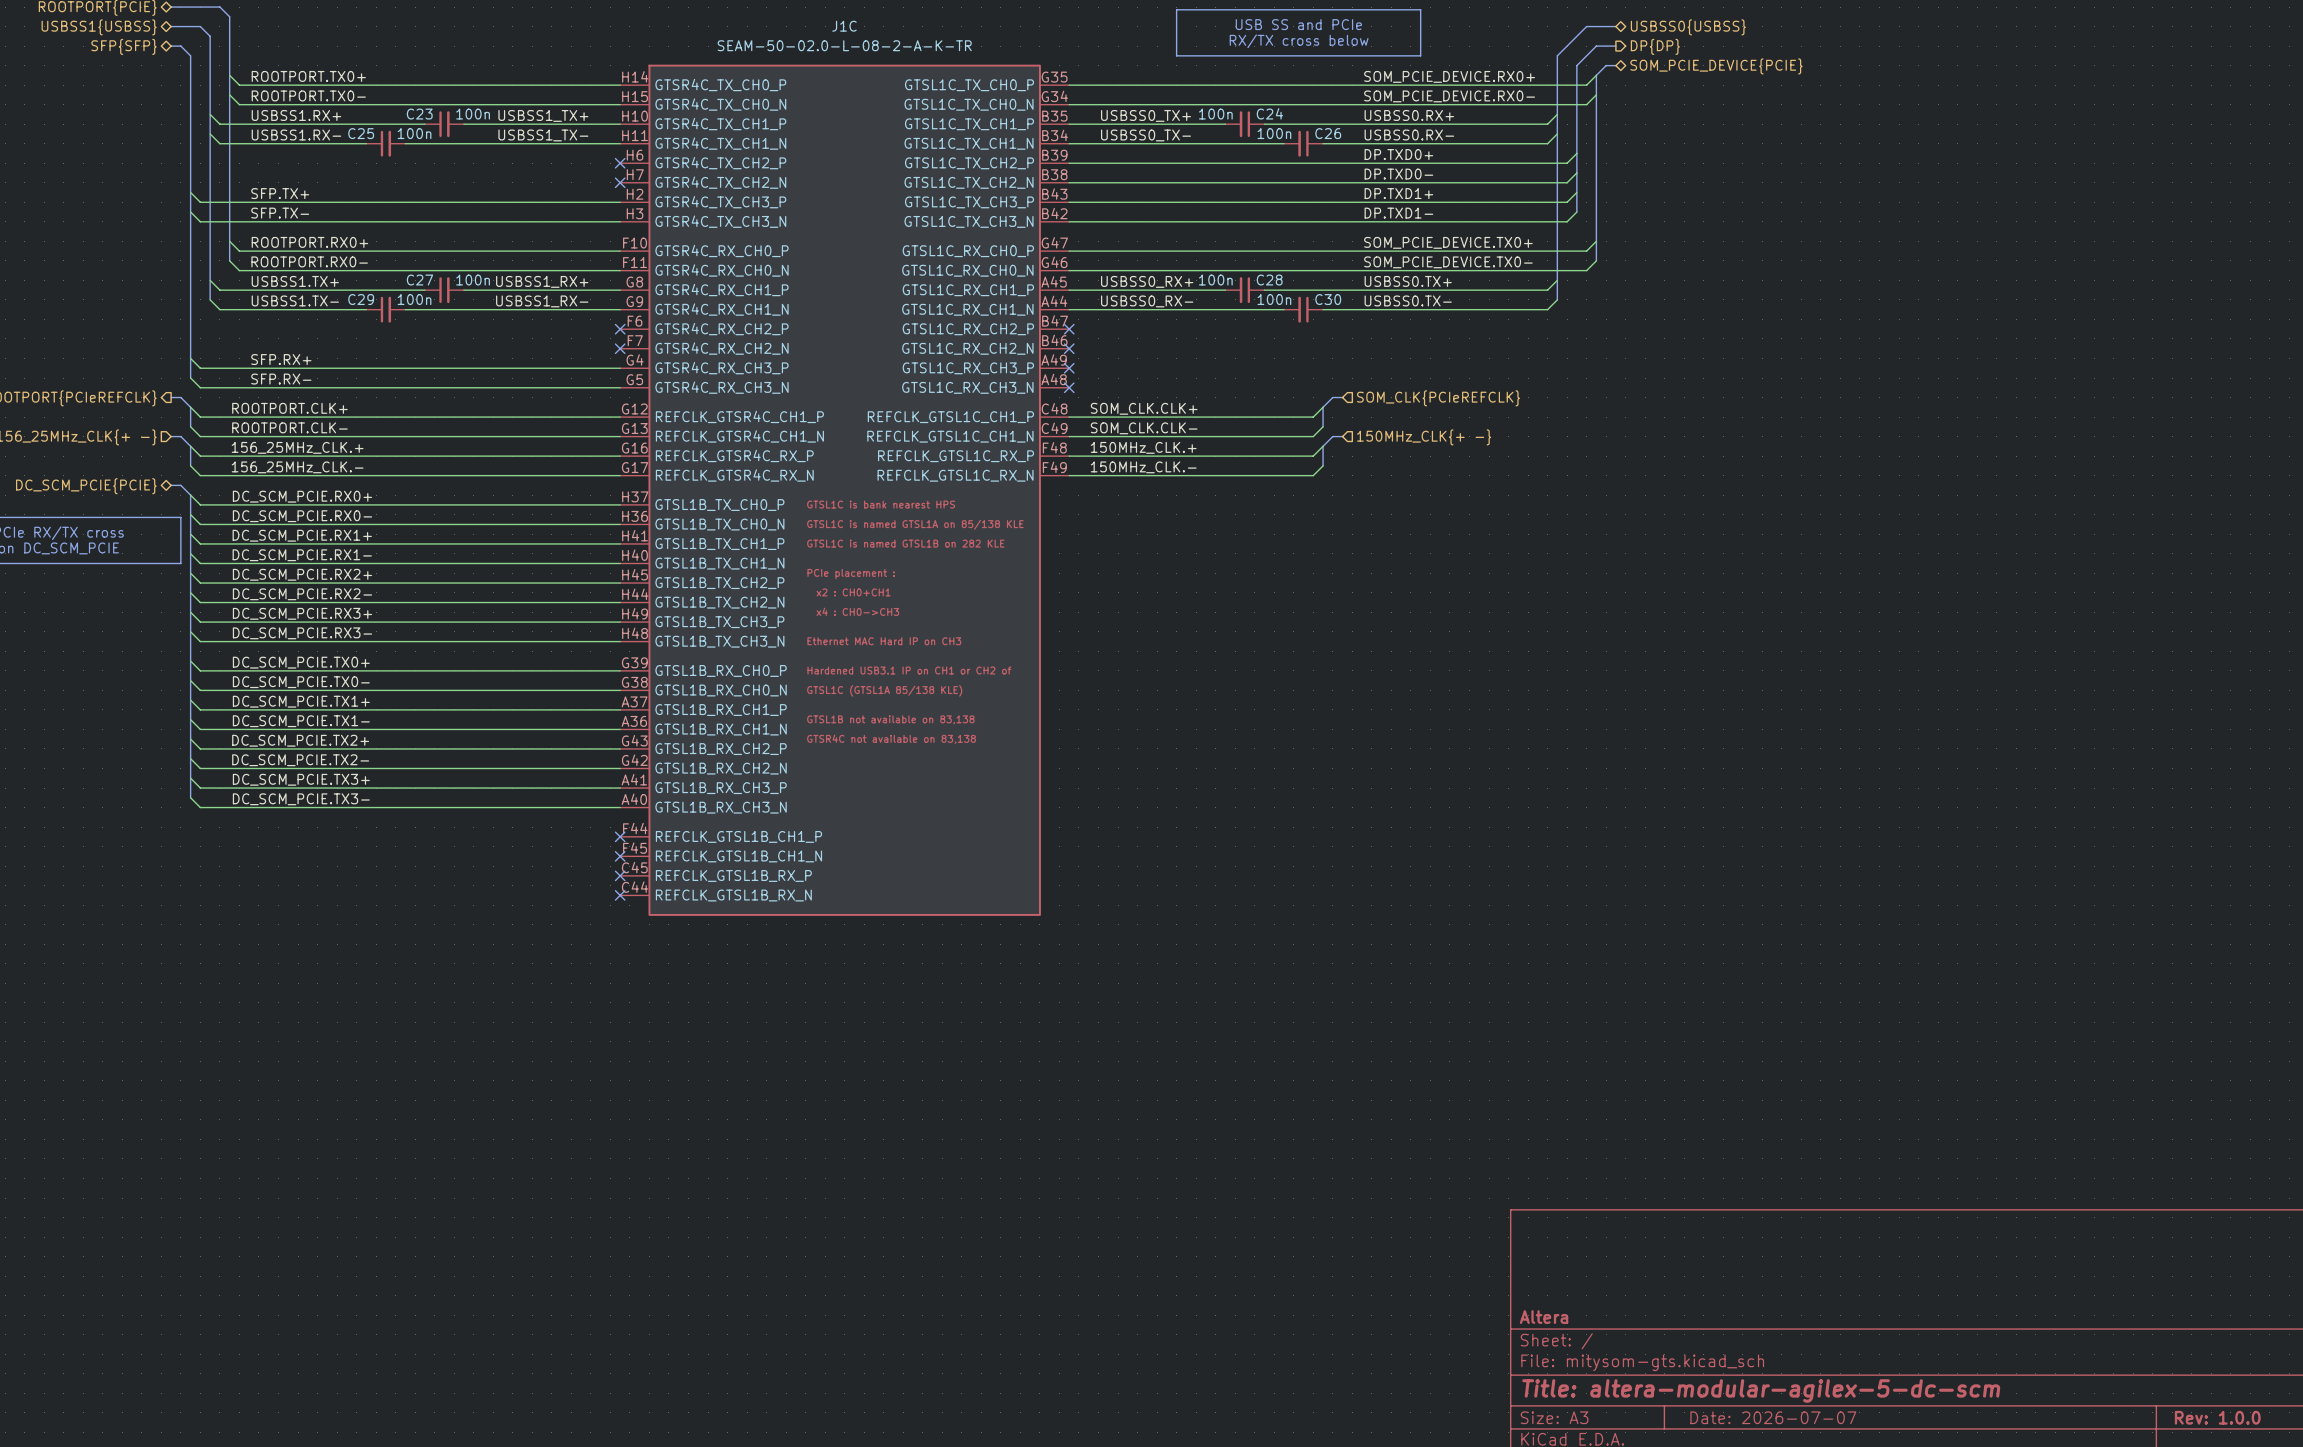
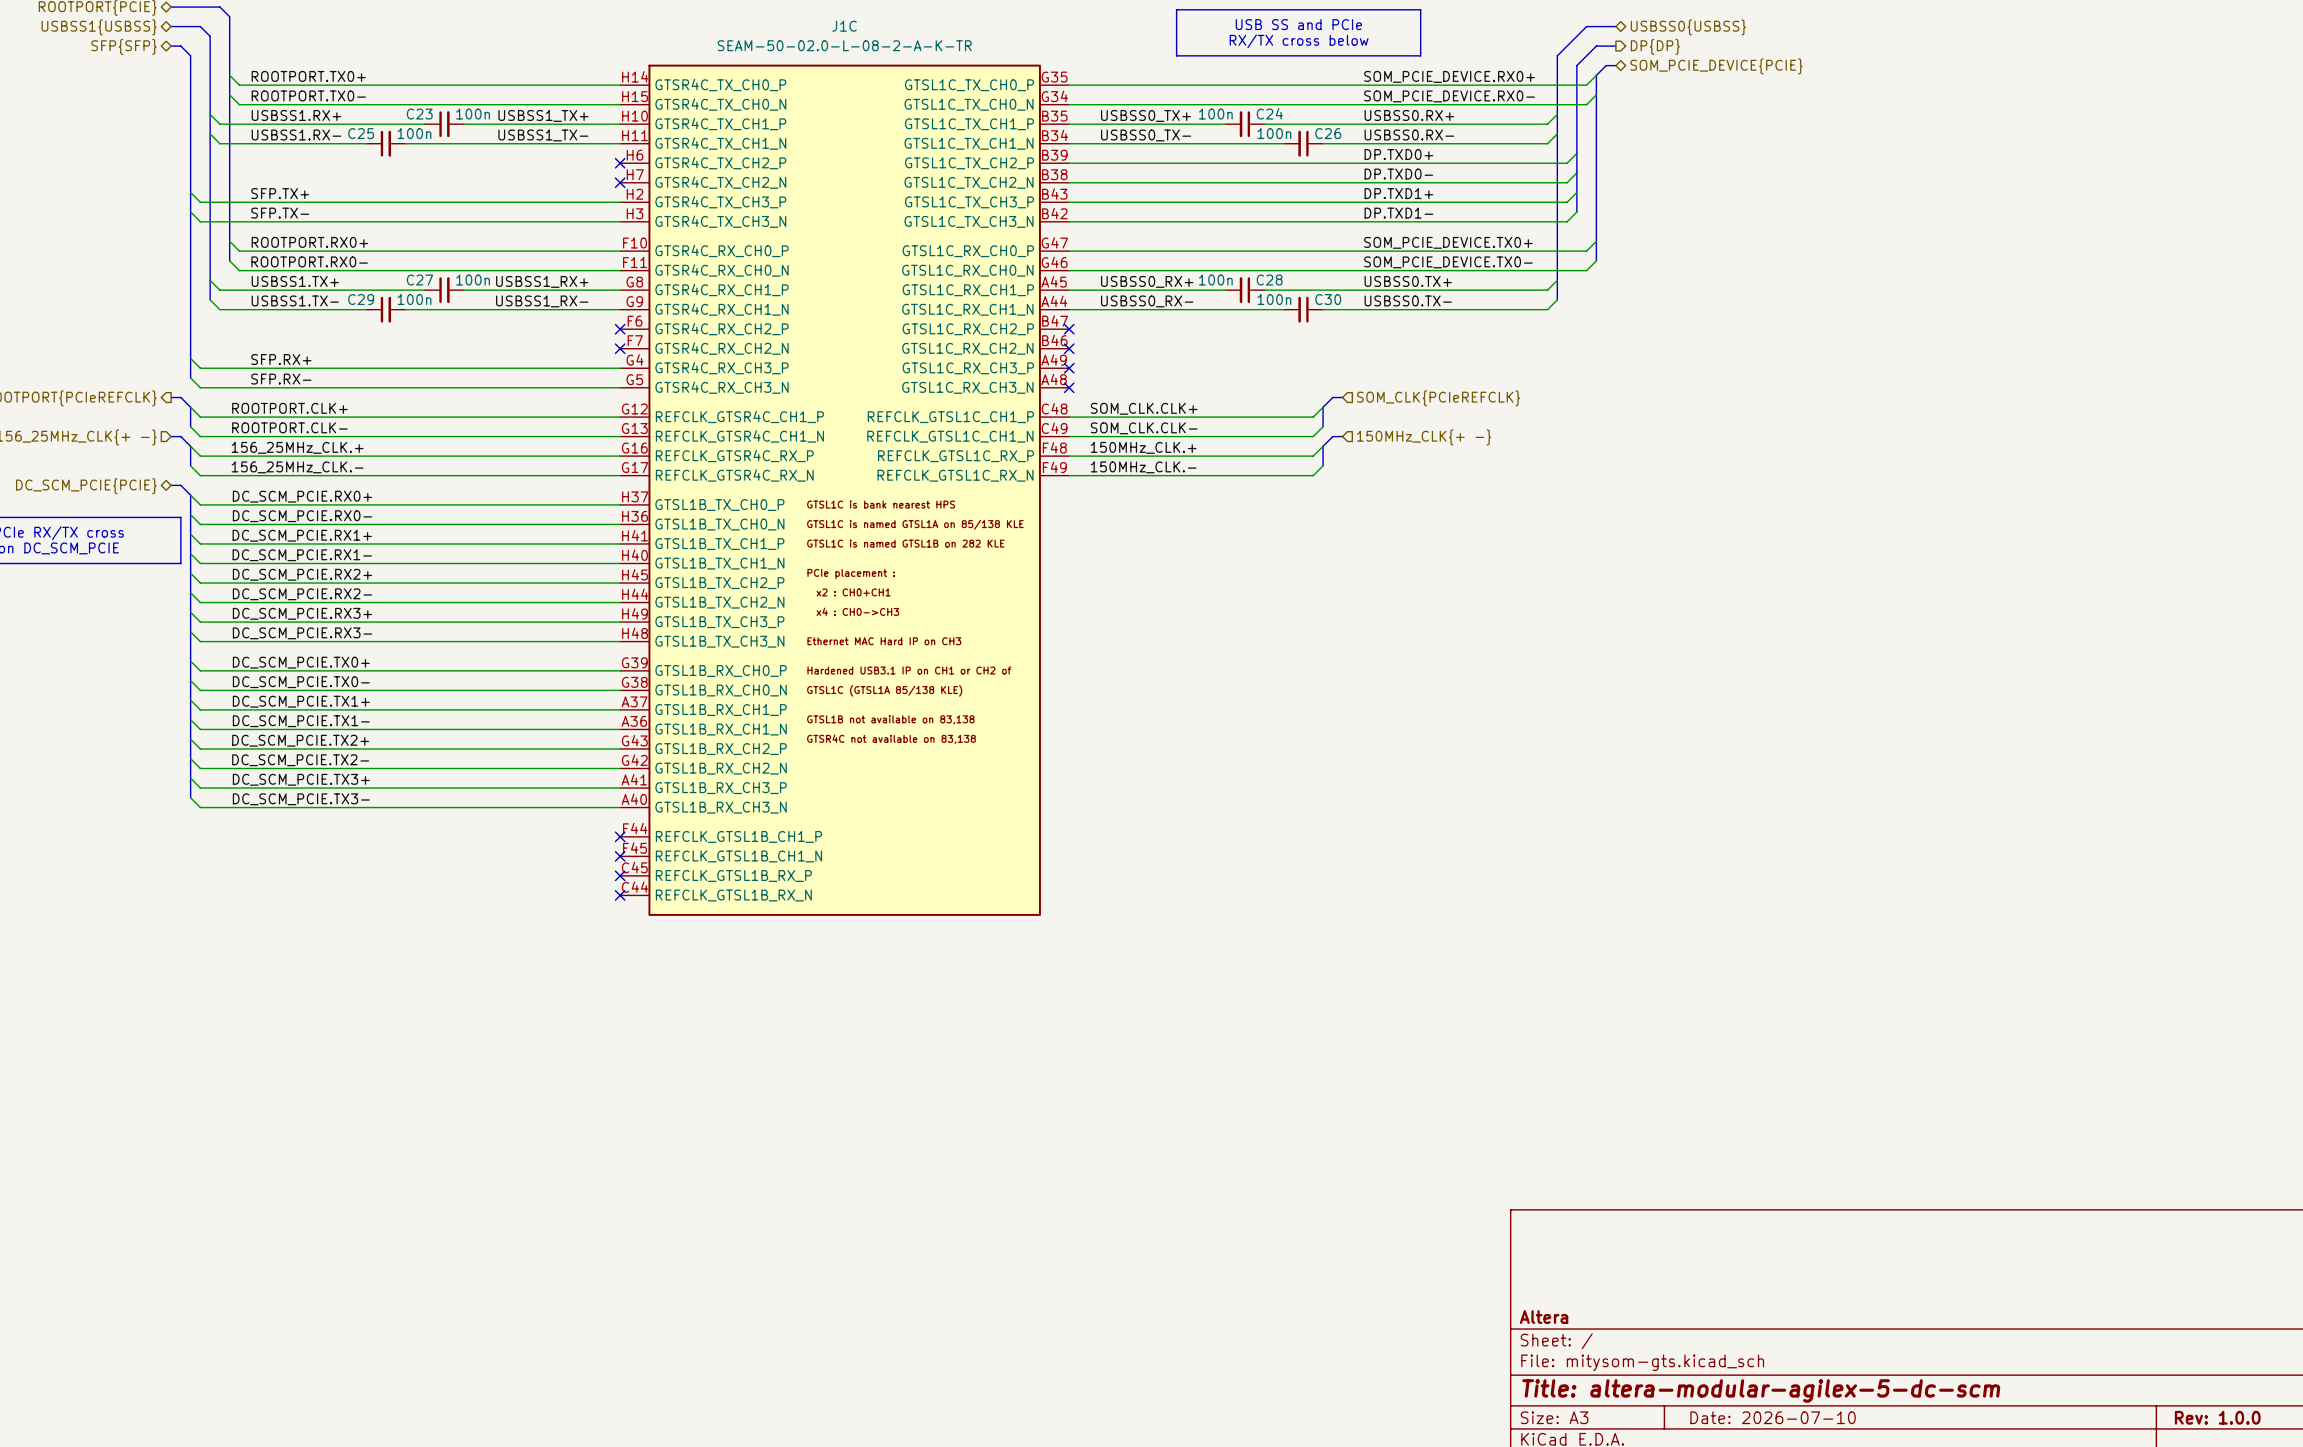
title block: Date: 2026-07-07 (1773, 1417) -> Date: 2026-07-10 (1773, 1417)

